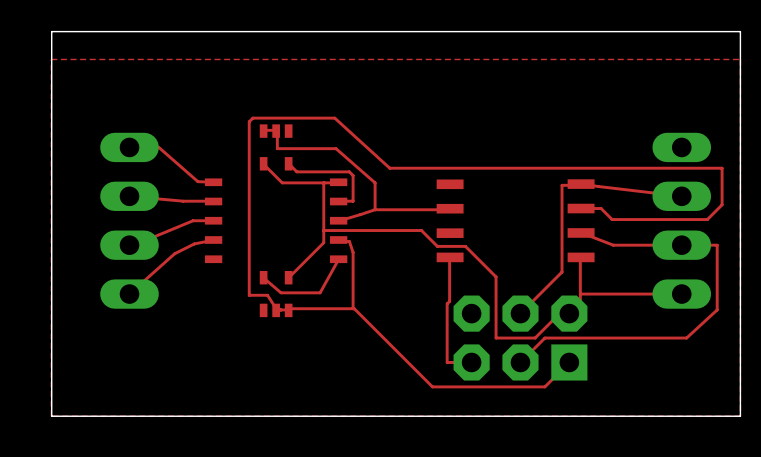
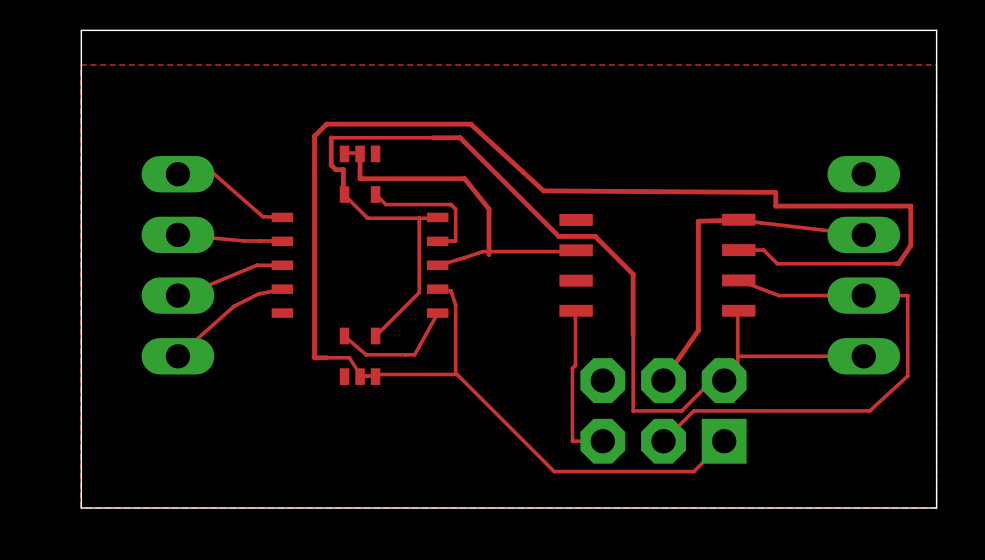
top track: (252, 118) (249, 121) (249, 295) -> (331, 137) (331, 165) (335, 169) (343, 169) (344, 195)
top track: (334, 118) (389, 168) (722, 168) (722, 204) (707, 219) -> (326, 357) (314, 357) (314, 136) (326, 124) (470, 124) (543, 190) (775, 192) (775, 206) (910, 206) (910, 245) (898, 263) (895, 263)
top track: (276, 131) (277, 148) (335, 148) (375, 182) (375, 209) -> (360, 152) (360, 178) (464, 178) (489, 209) (489, 254)
top track: (581, 184) (562, 185) (562, 272) (520, 313) -> (751, 219) (698, 221) (698, 330) (663, 380)
top track: (323, 230) (421, 230) (437, 246) (465, 246) (496, 276) -> (432, 137) (460, 137) (558, 236) (595, 236) (633, 274) (633, 335)

